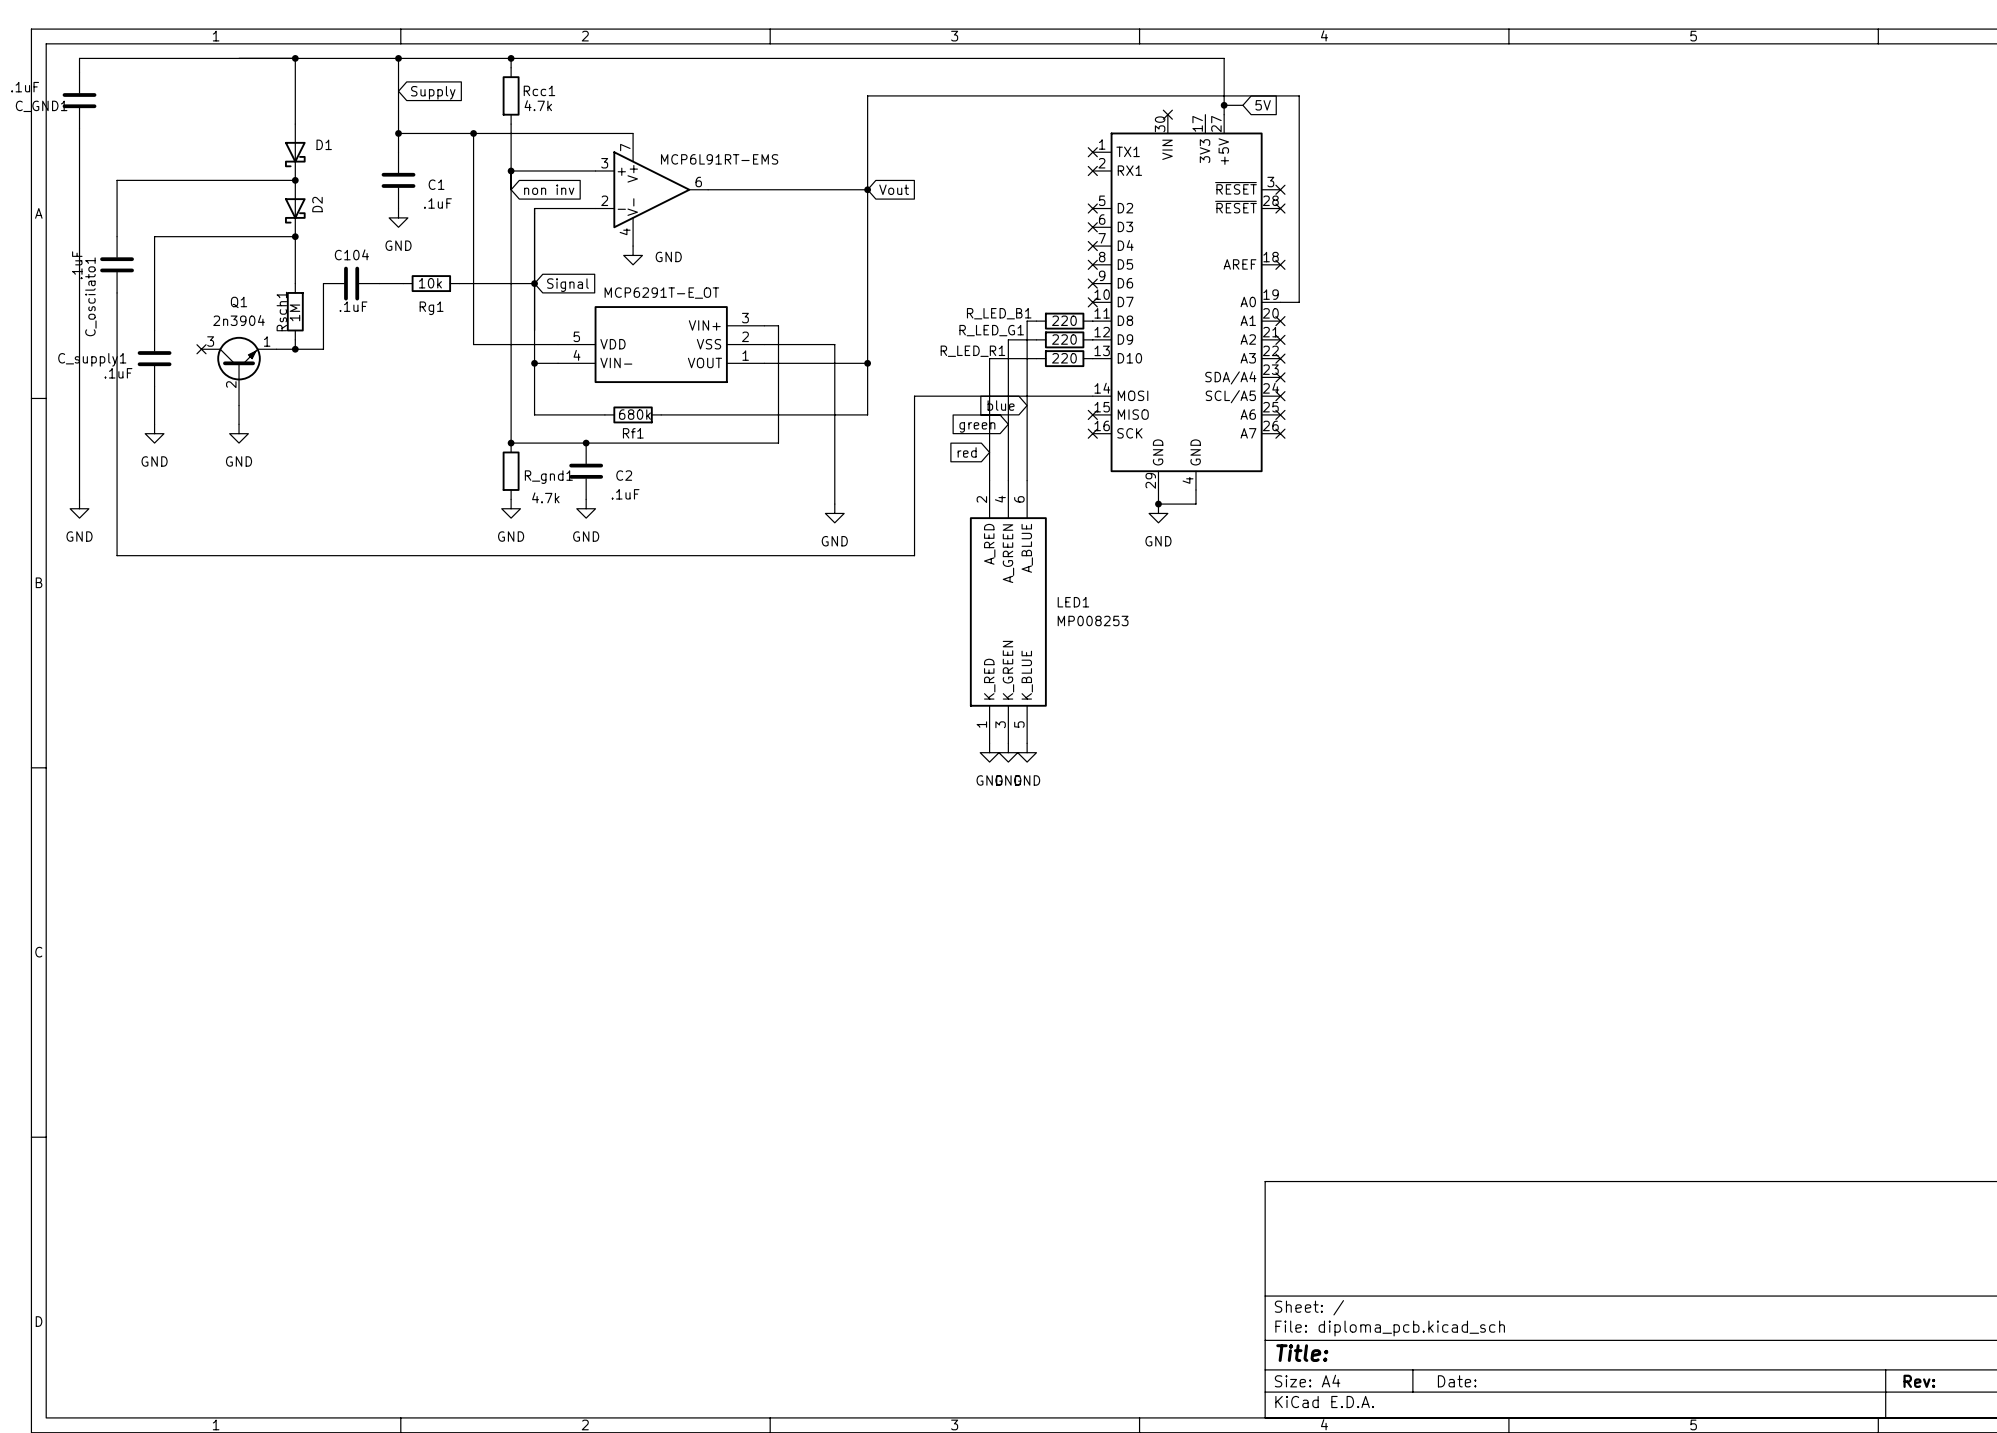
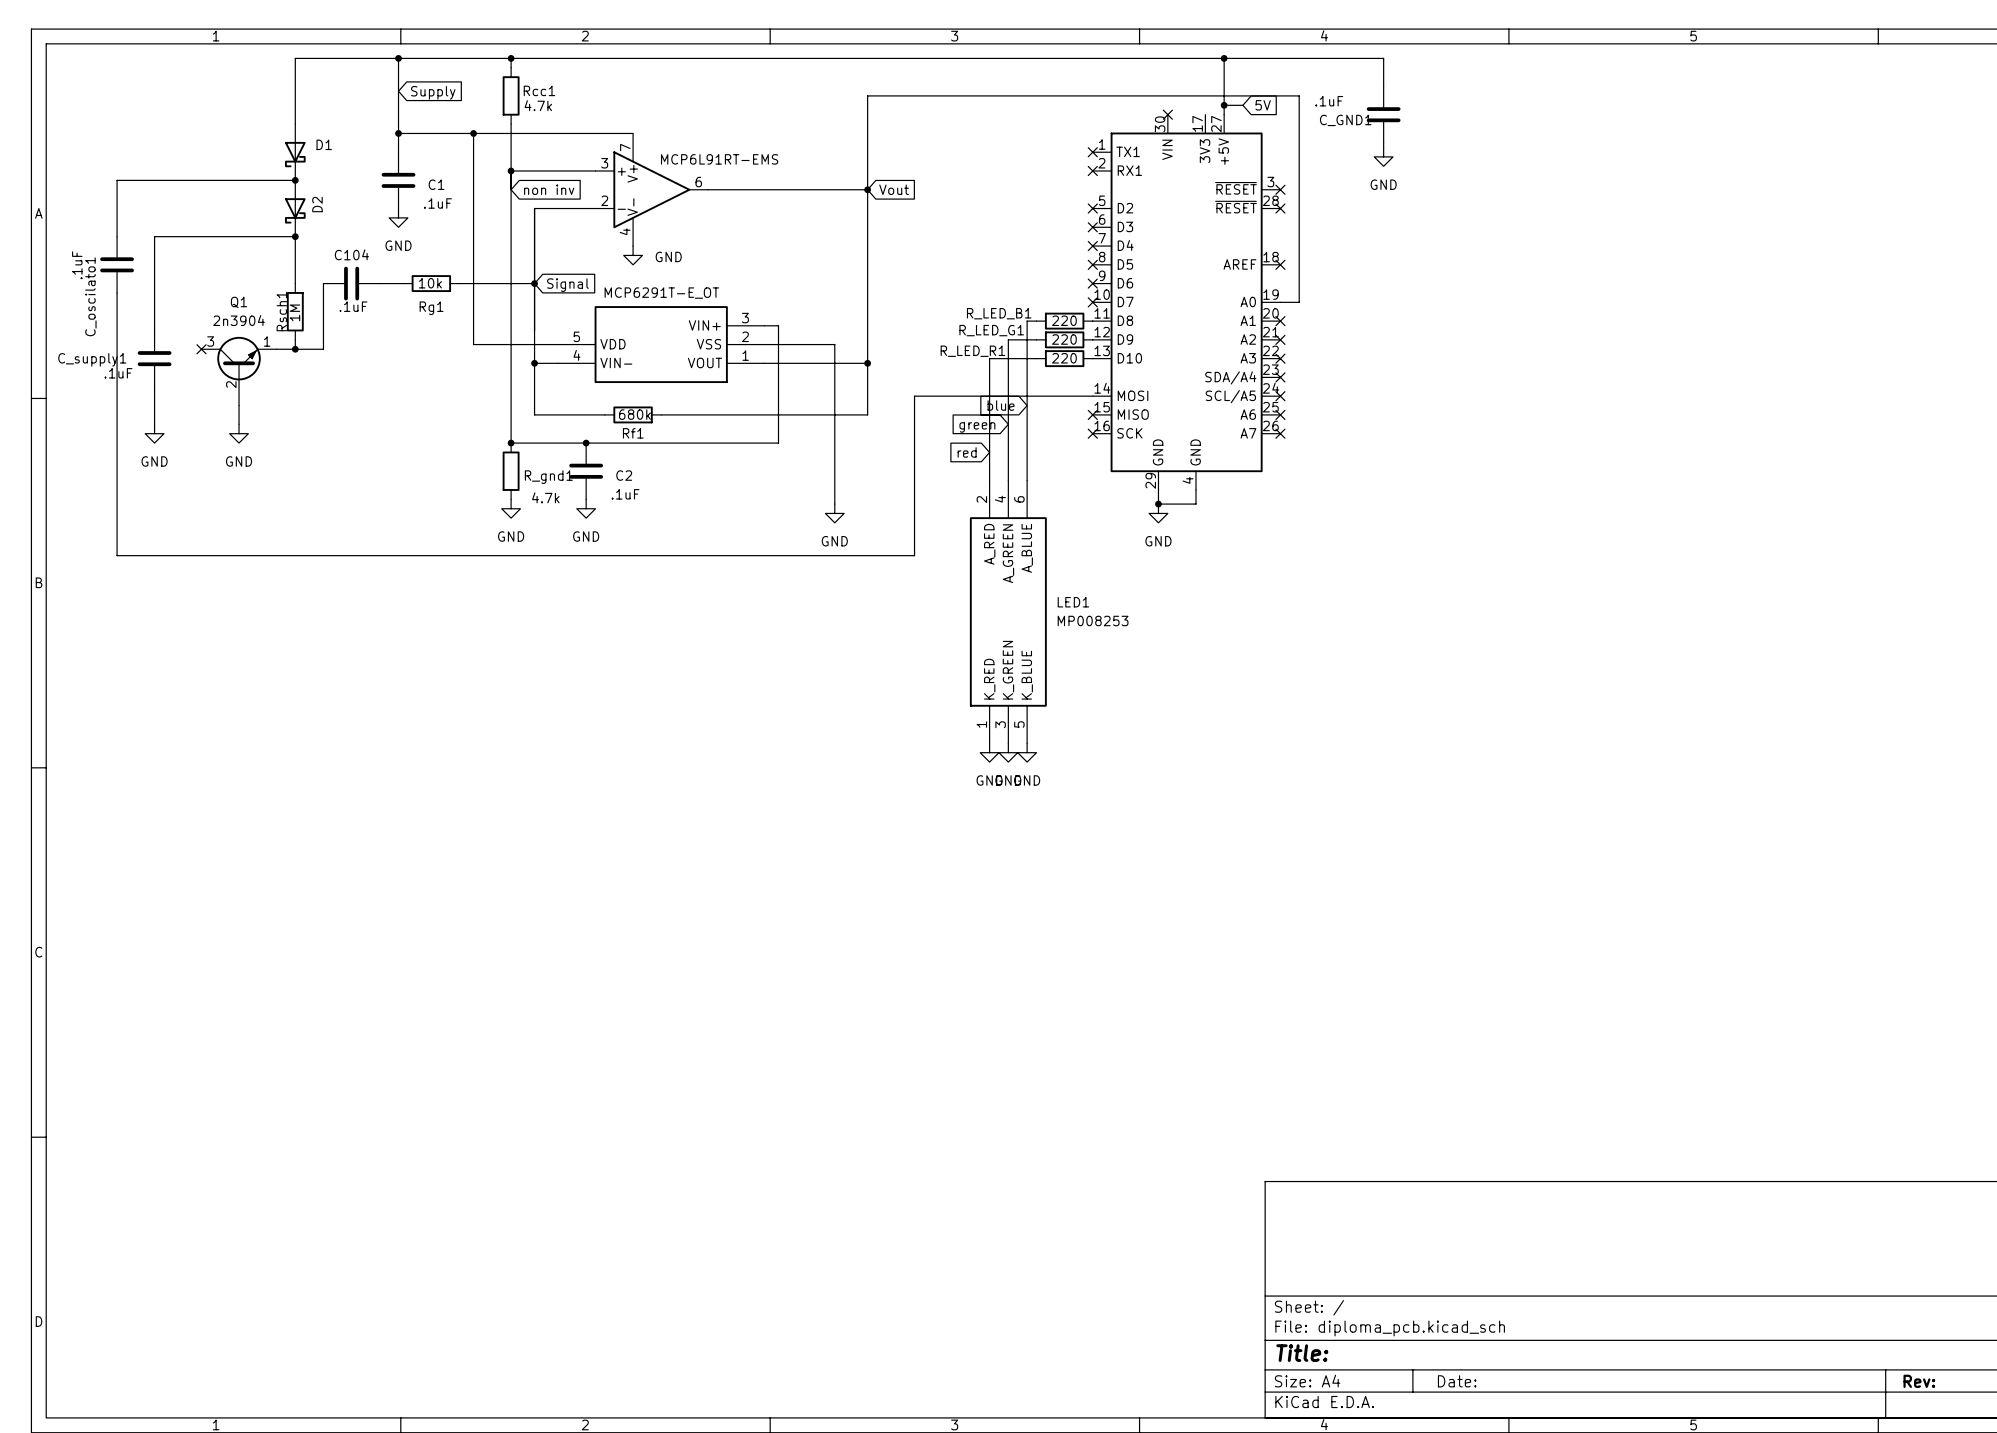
wire: (295, 58) (79, 58) (79, 72) -> none
junction: (295, 58) -> none
wire: none -> (1224, 58) (1383, 58) (1383, 86)
junction: none -> (1224, 58)
C_GND1 position: (79, 100) -> (1383, 114)
wire: (79, 128) (79, 499) -> none
wire: none -> (1383, 142) (1383, 147)
power symbol: none -> GND (1383, 156)
power symbol: GND (79, 508) -> none

